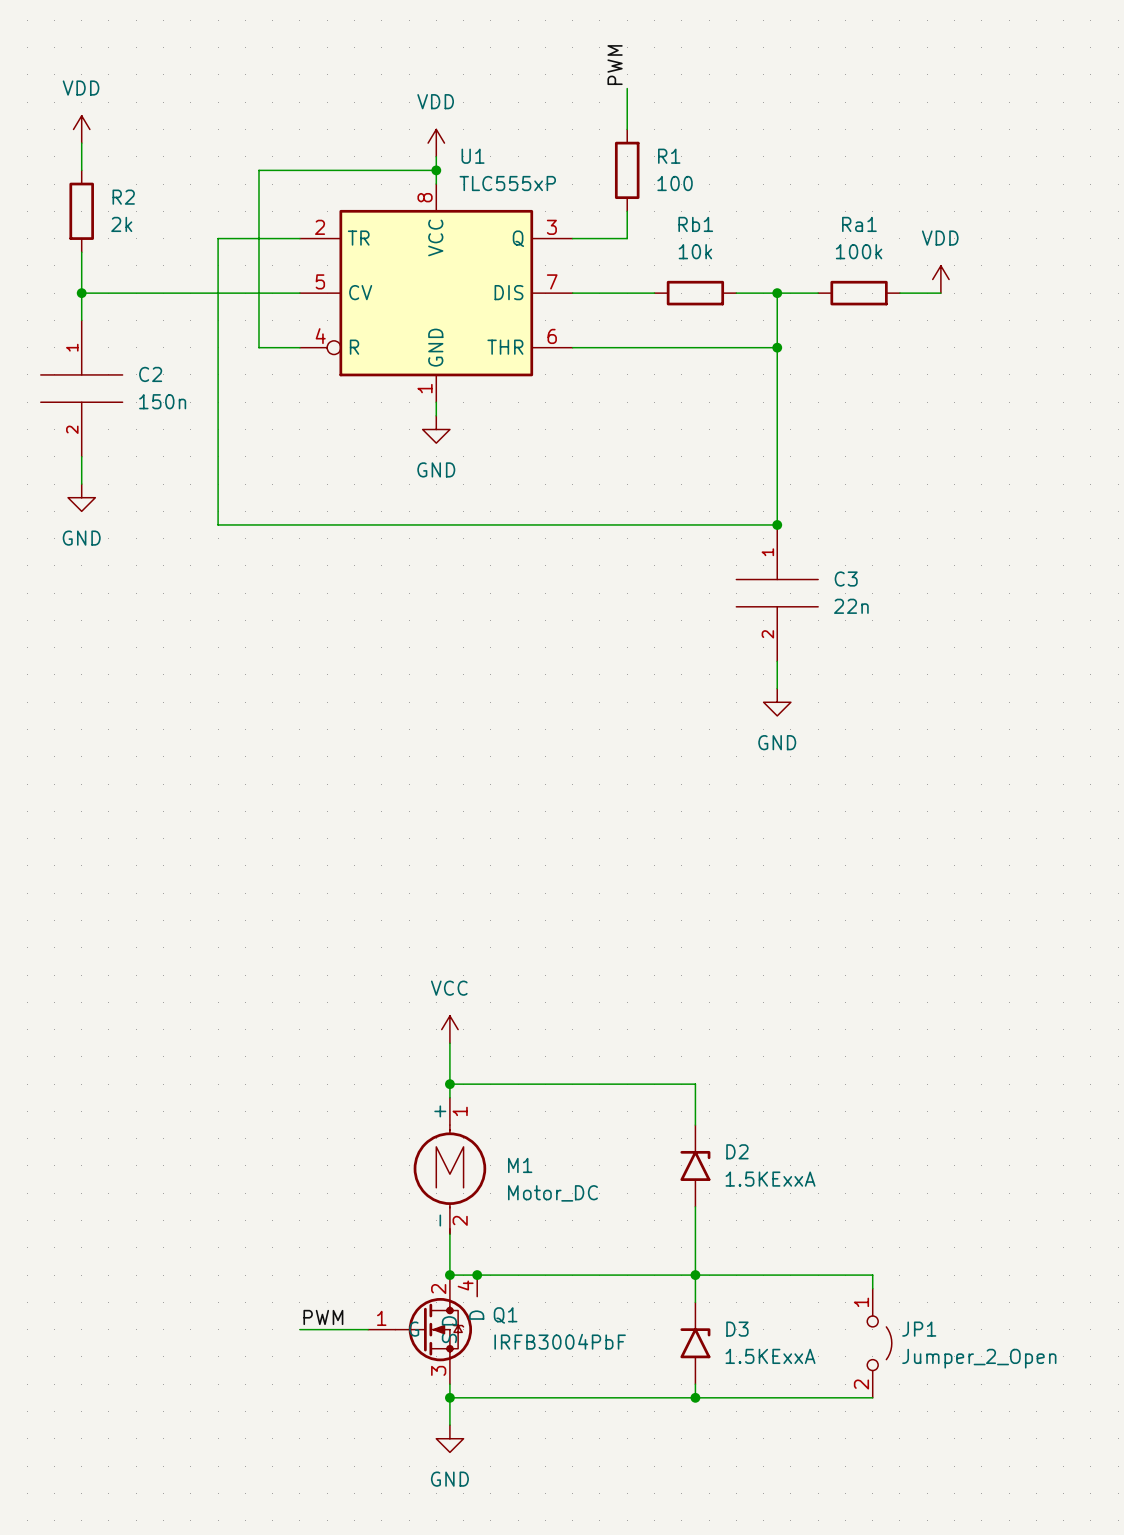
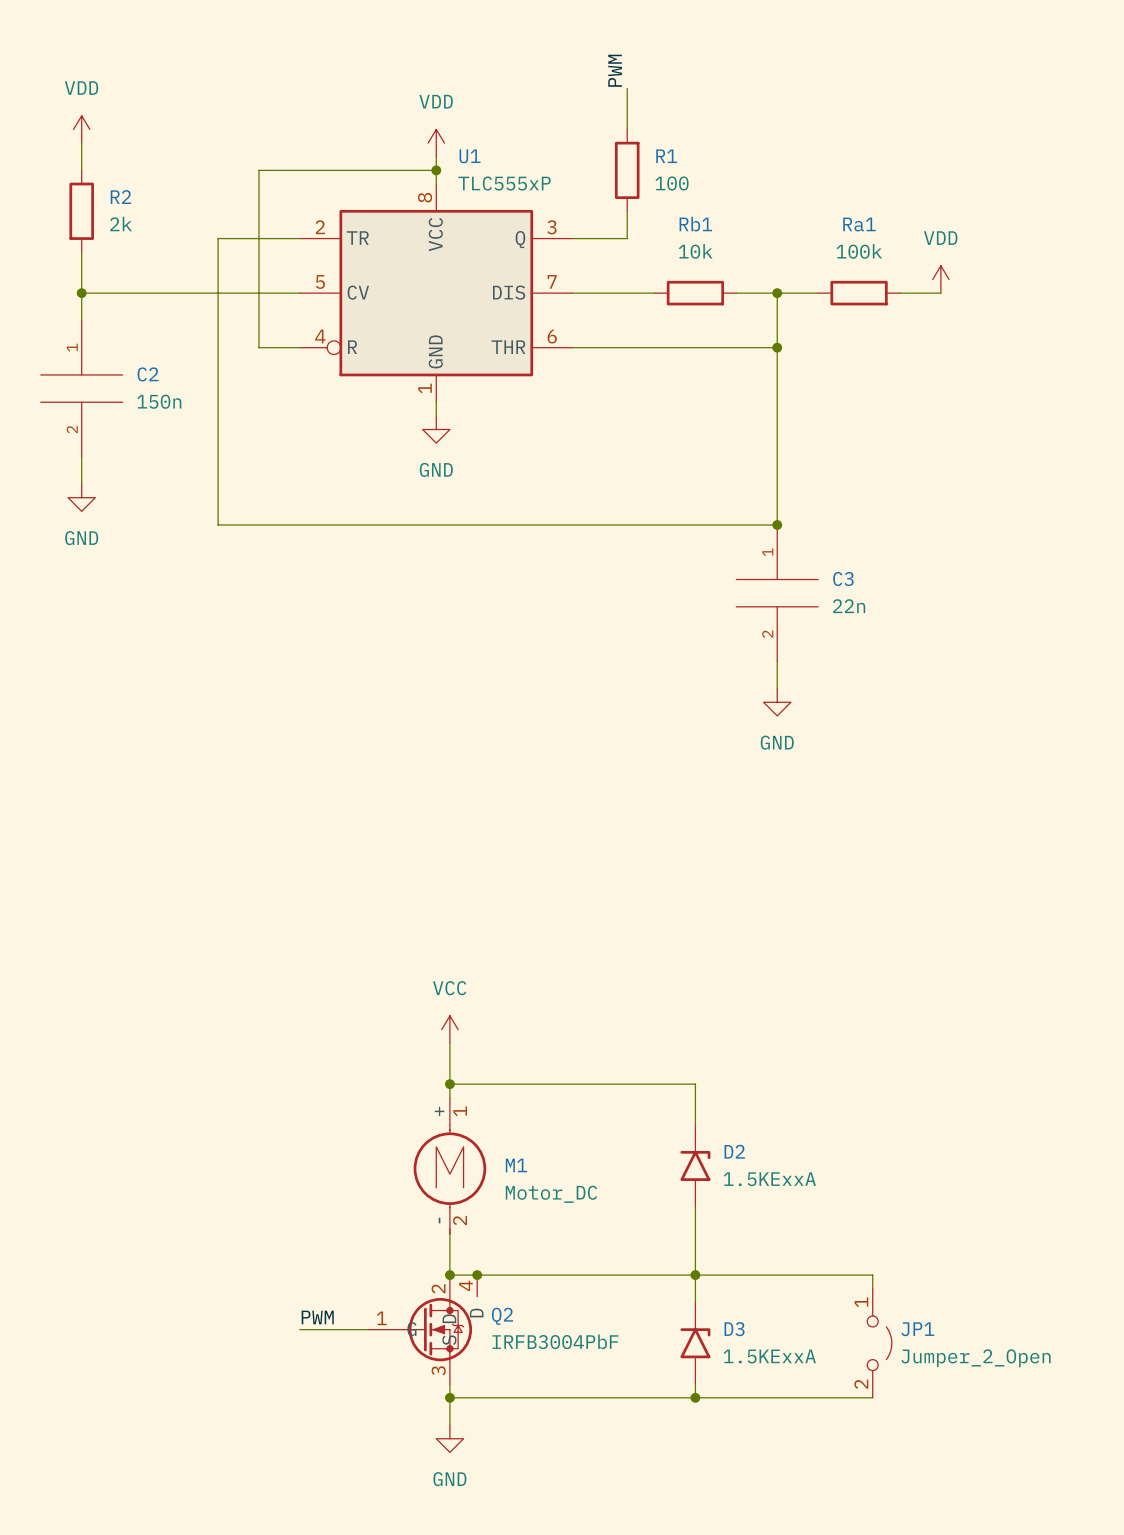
Q1 name: Q1 (505, 1315) -> Q2 (502, 1316)

